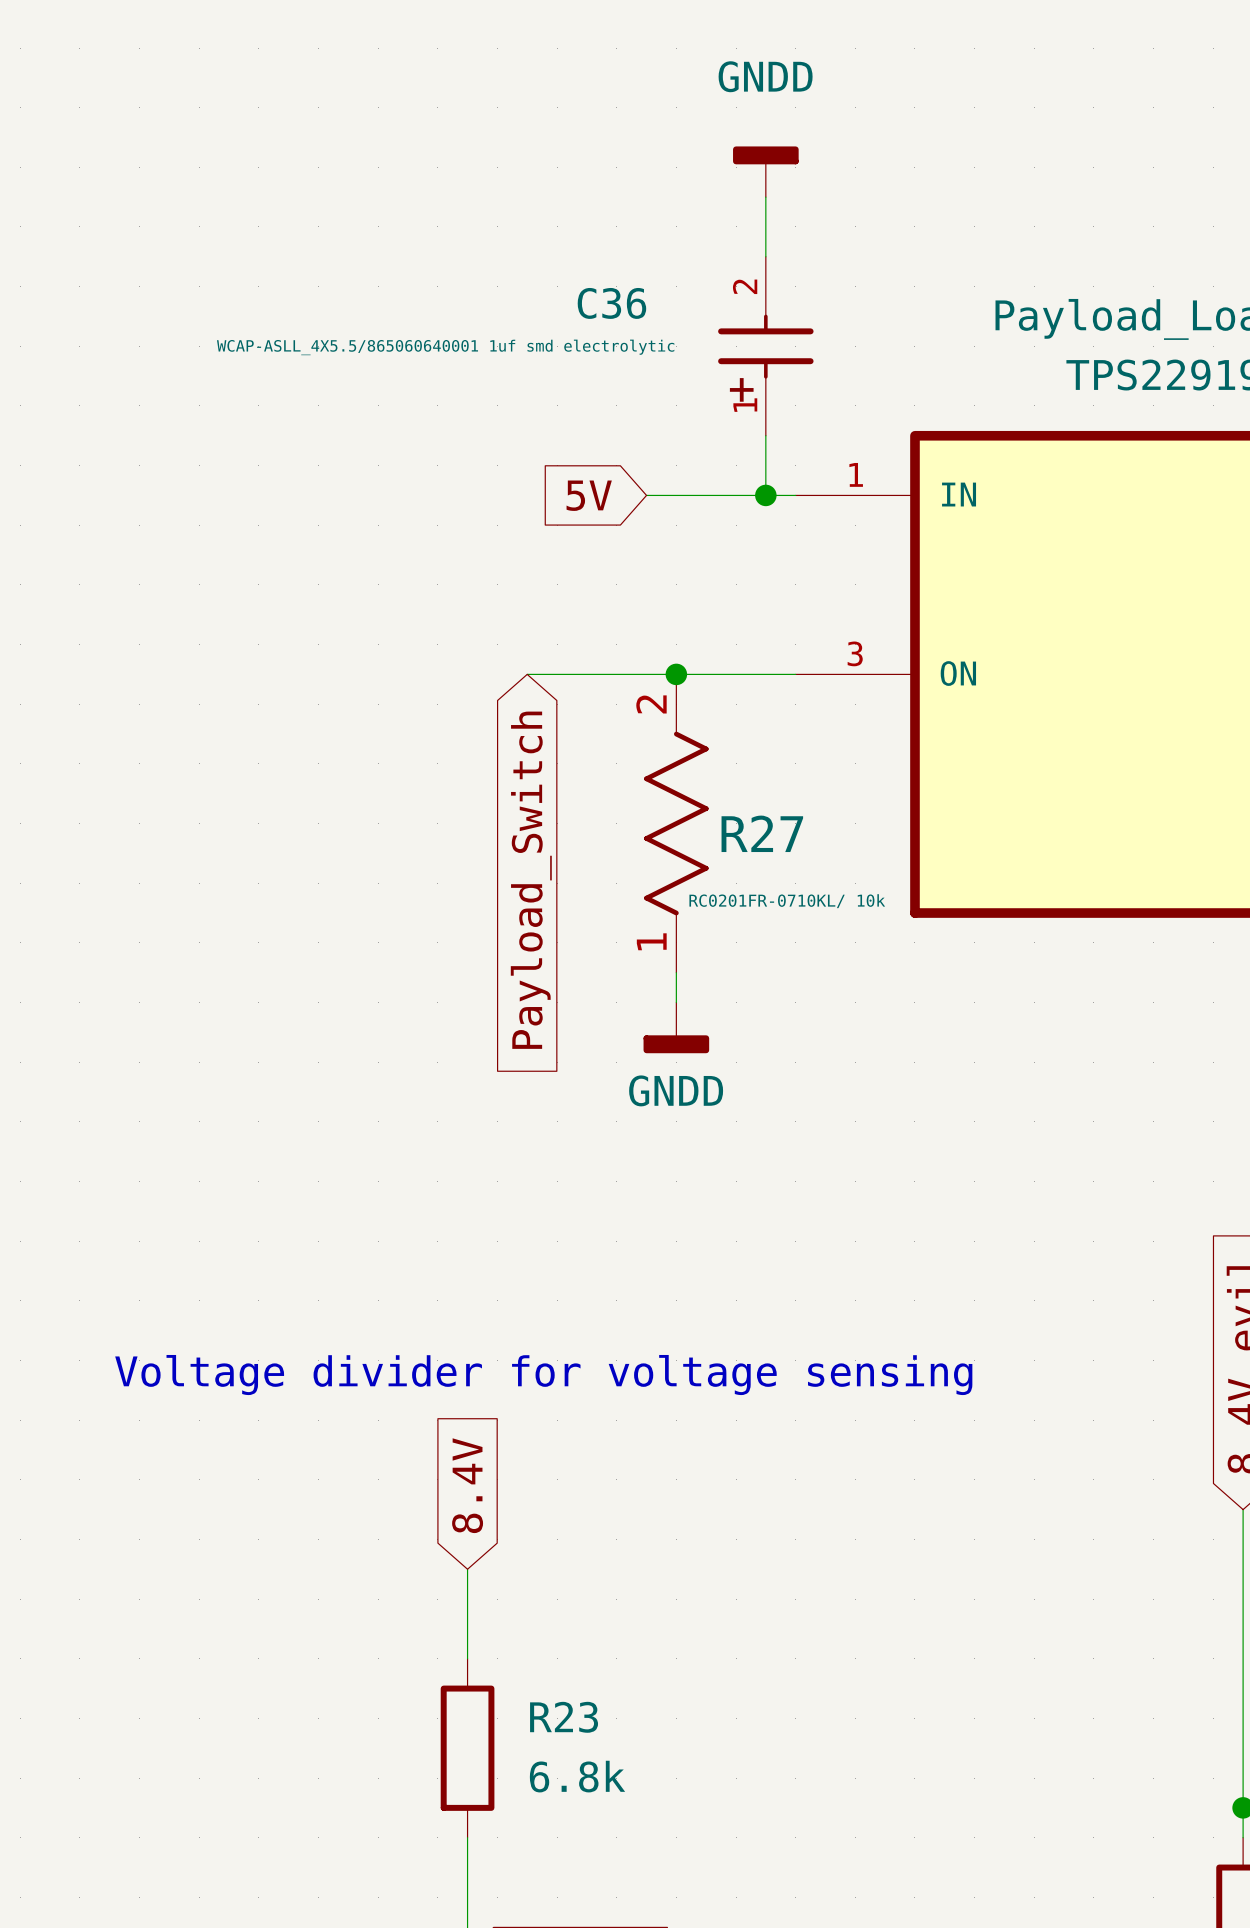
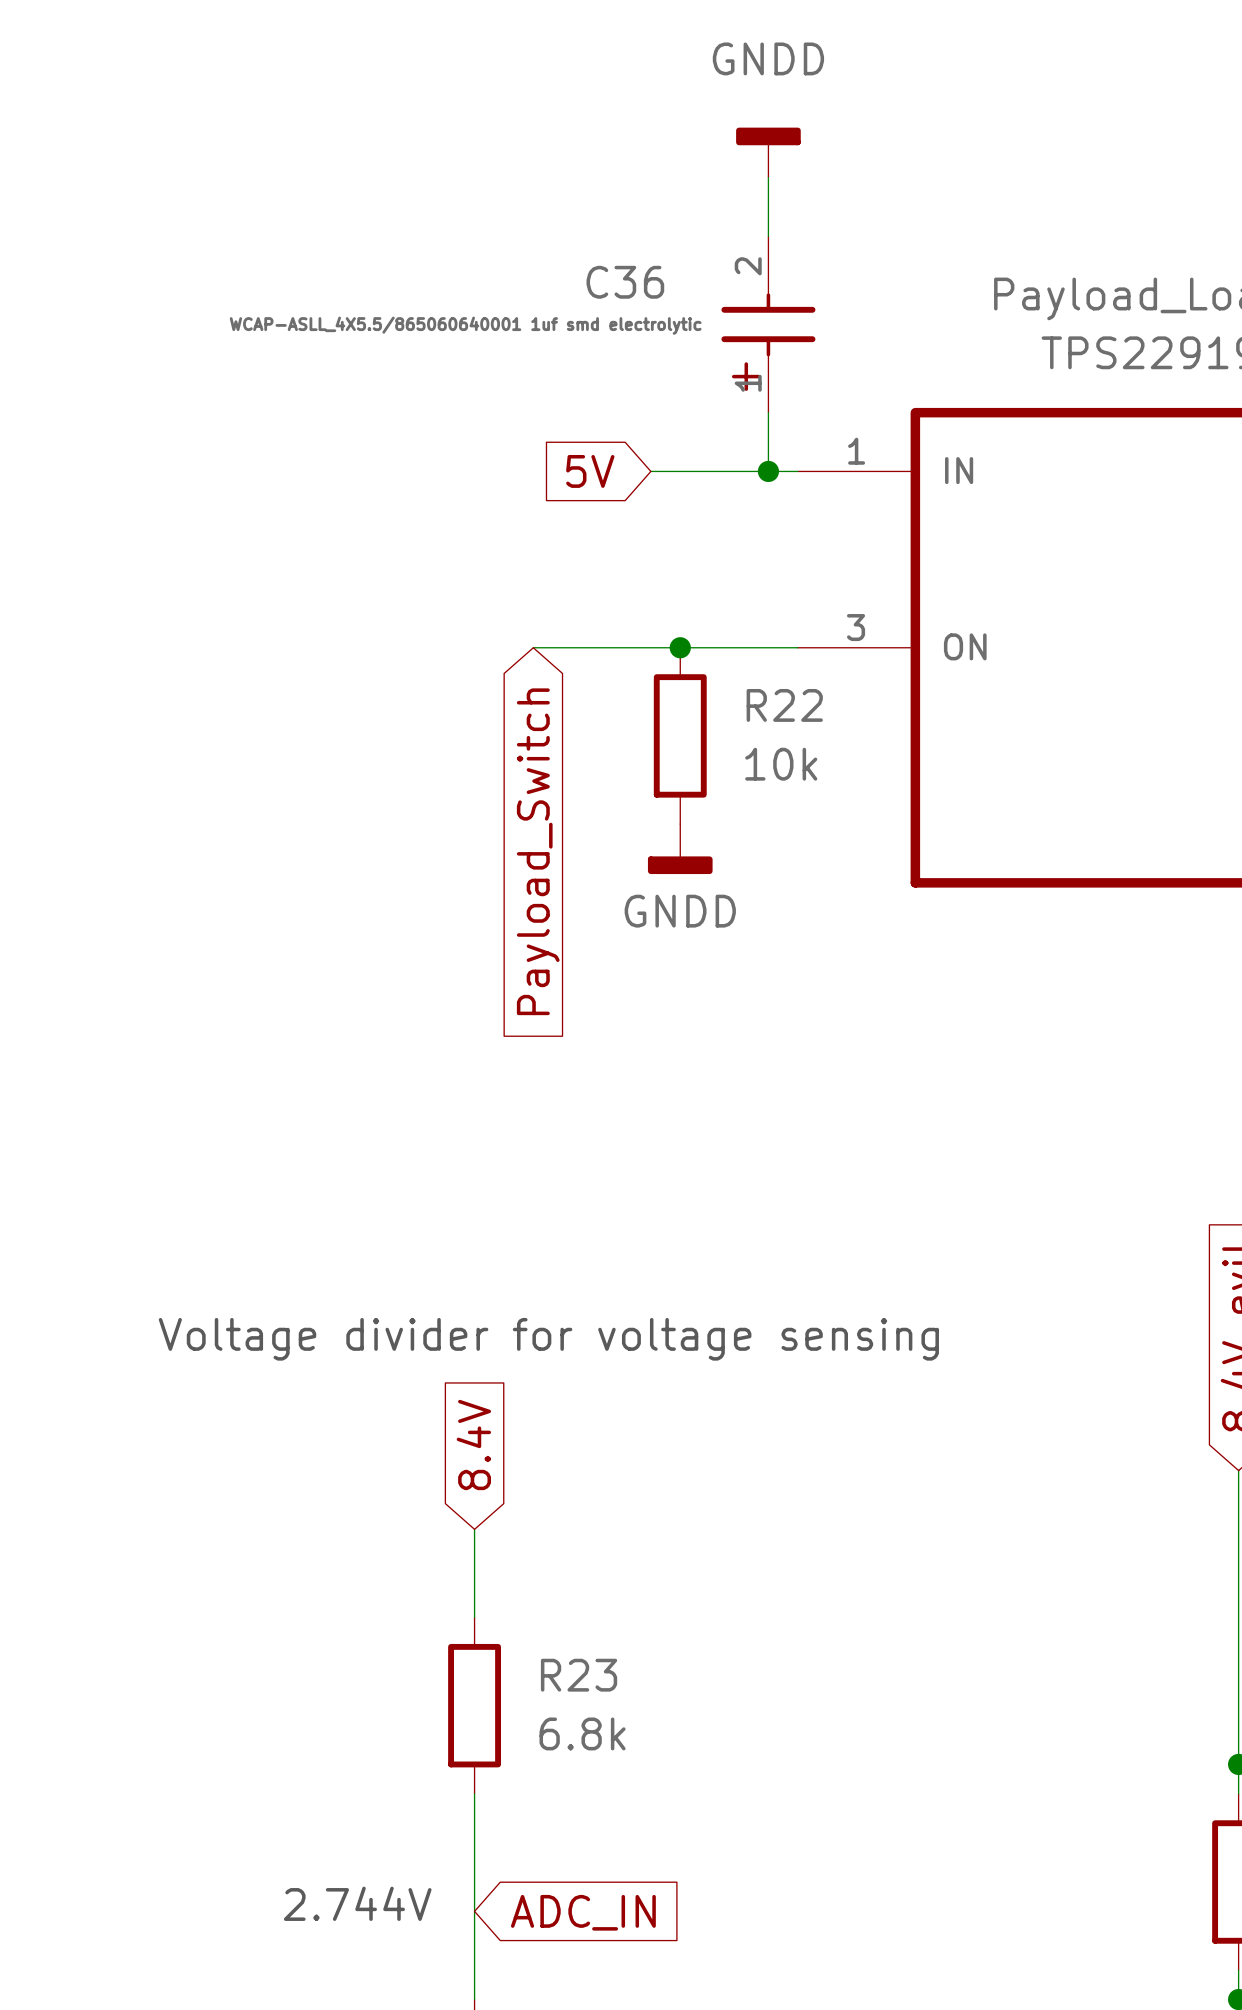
R22: none -> 10k (680, 735)
R27: RC0201FR-0710KL/ 10k (676, 823) -> none
wire: (676, 972) (676, 1002) -> none
power symbol position: GNDD (676, 1027) -> GNDD (680, 849)

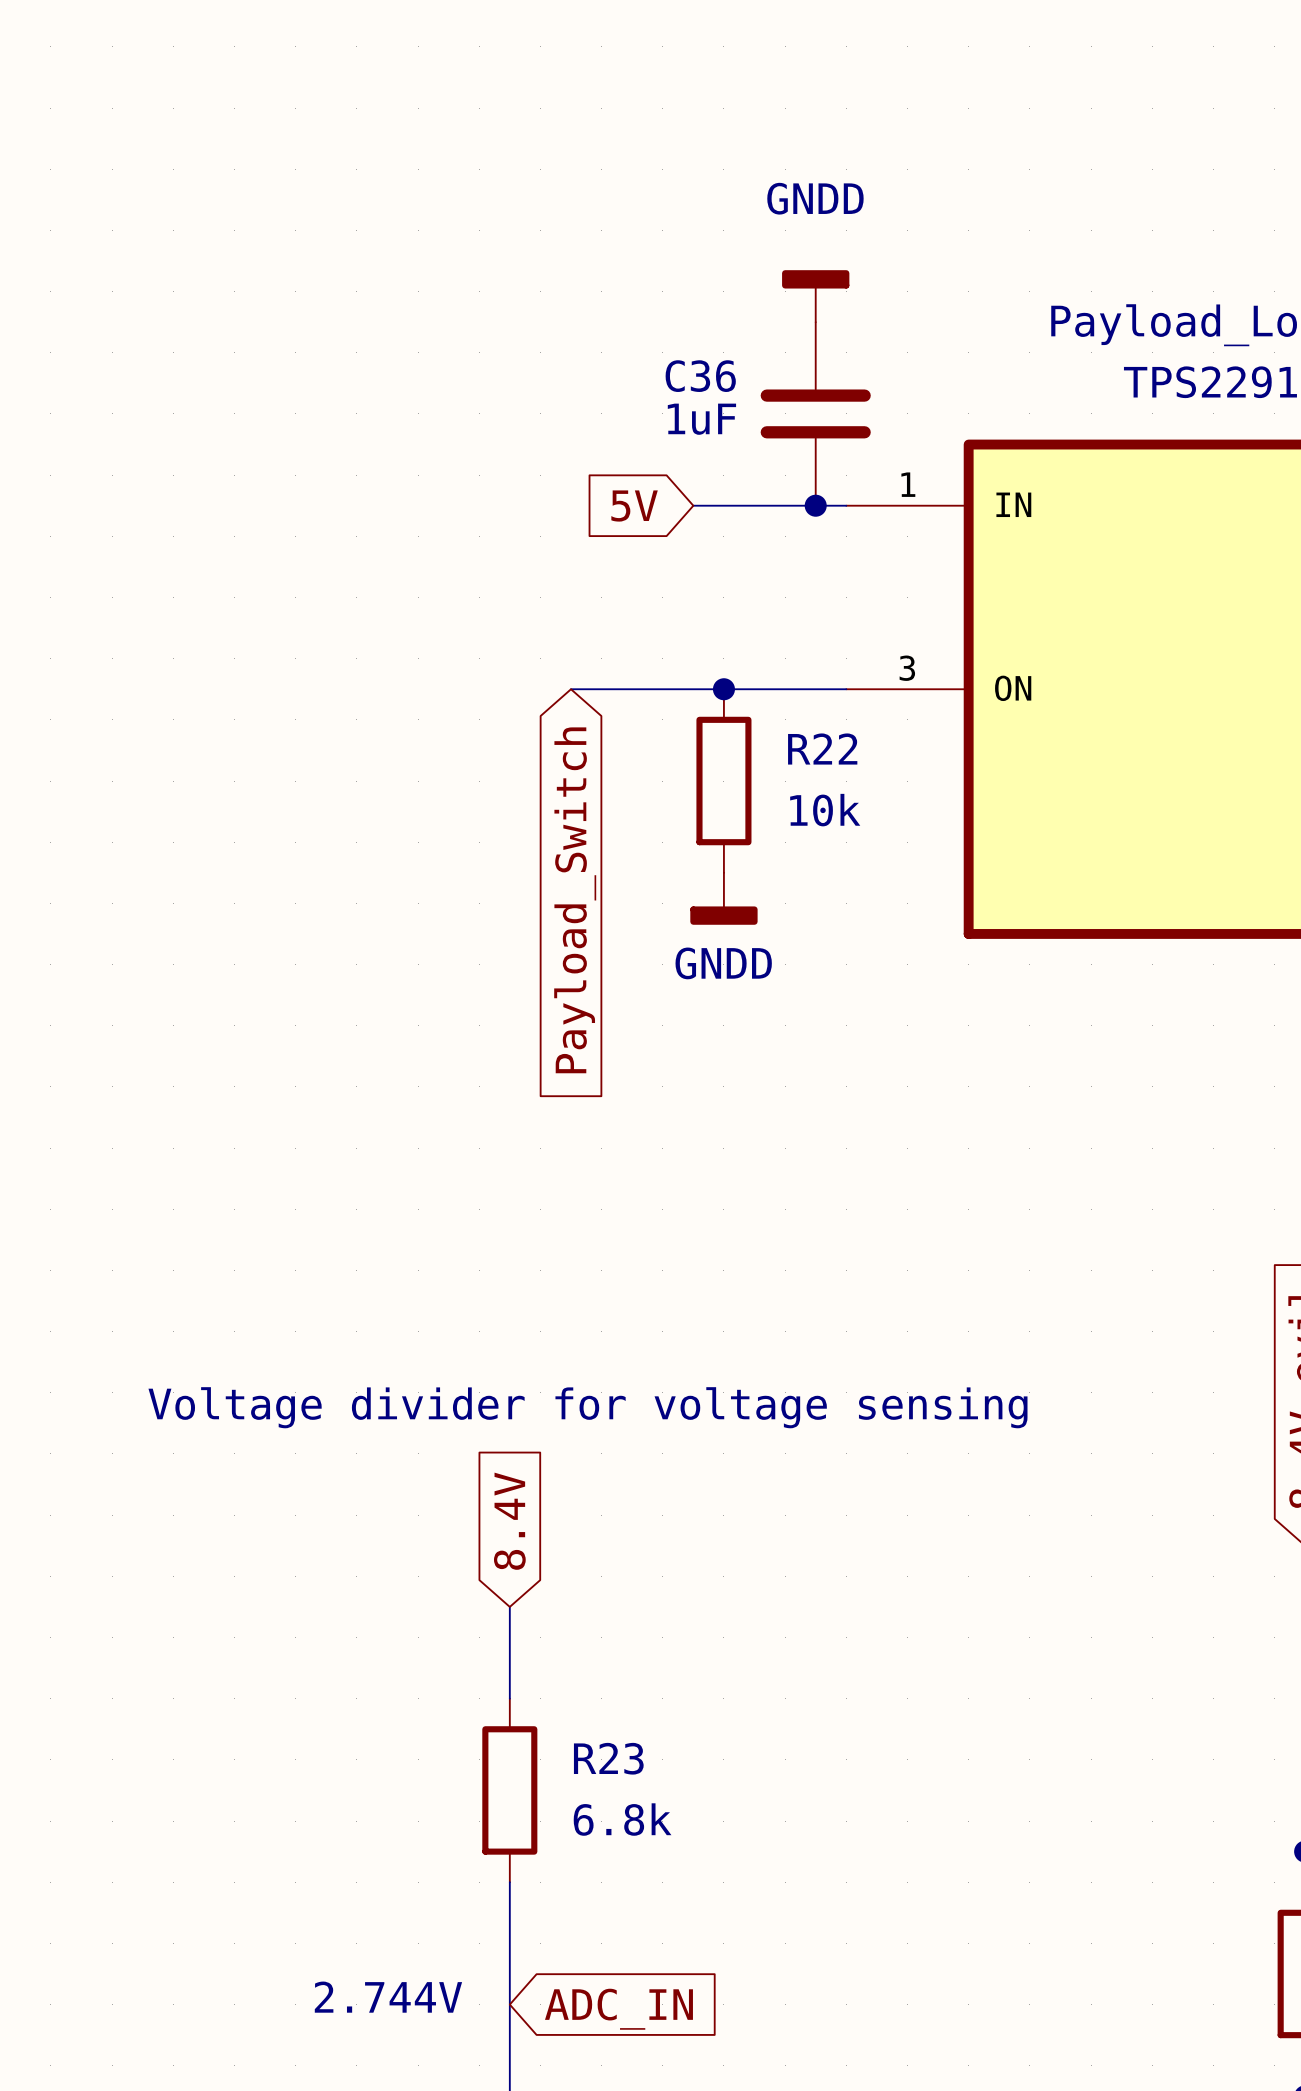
power symbol position: GNDD (768, 152) -> GNDD (815, 296)
wire: (768, 177) (768, 236) -> none
C36 symbol: [721, 236, 816, 413] -> [760, 322, 871, 506]
C36 value: WCAP-ASLL_4X5.5/865060640001 1uf smd electrolytic (465, 325) -> 1uF (701, 419)

